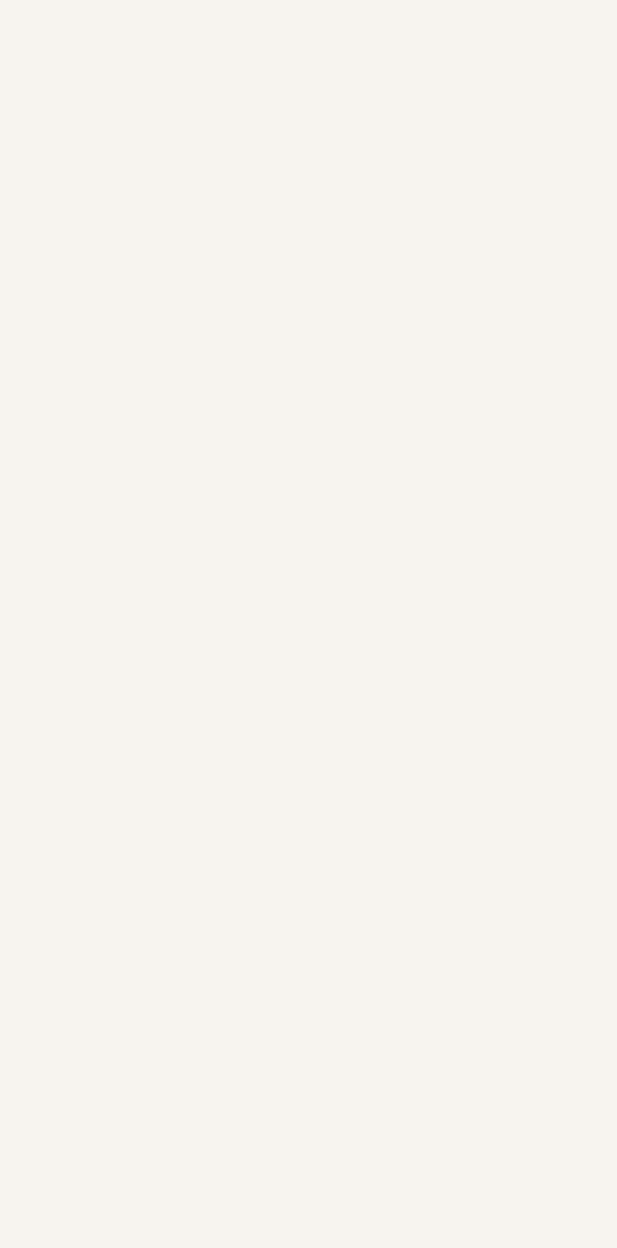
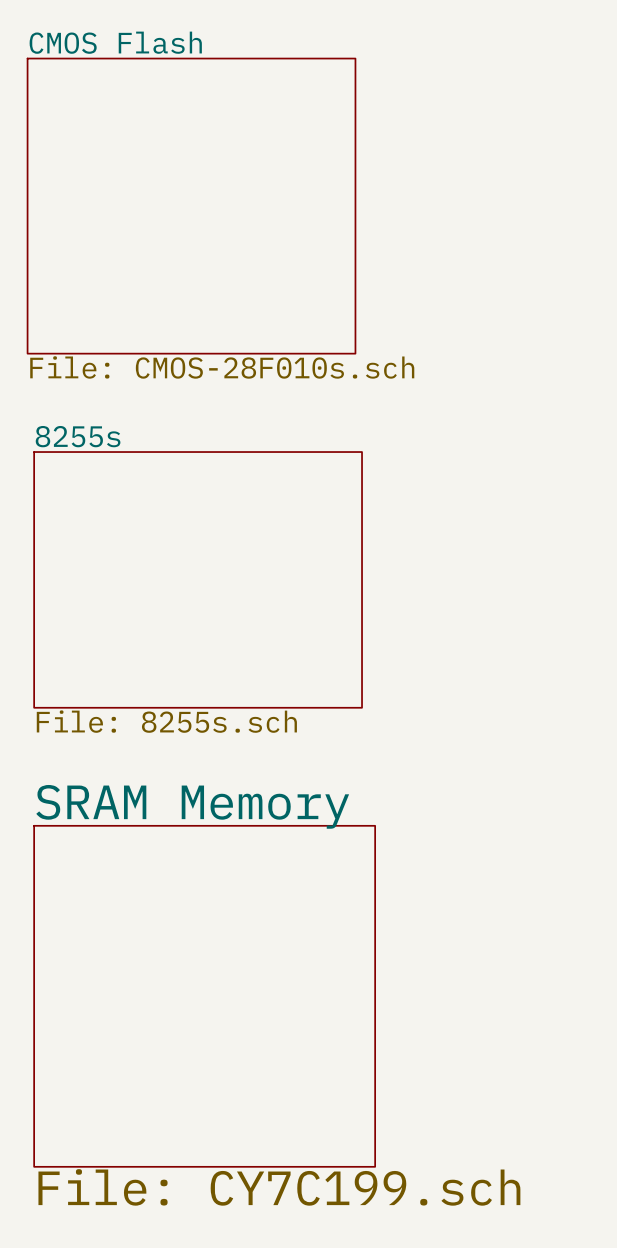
sheet CMOS Flash: none -> File: CMOS-28F010s.sch (191, 206)
sheet 8255s: none -> File: 8255s.sch (198, 579)
sheet SRAM Memory: none -> File: CY7C199.sch (204, 996)

